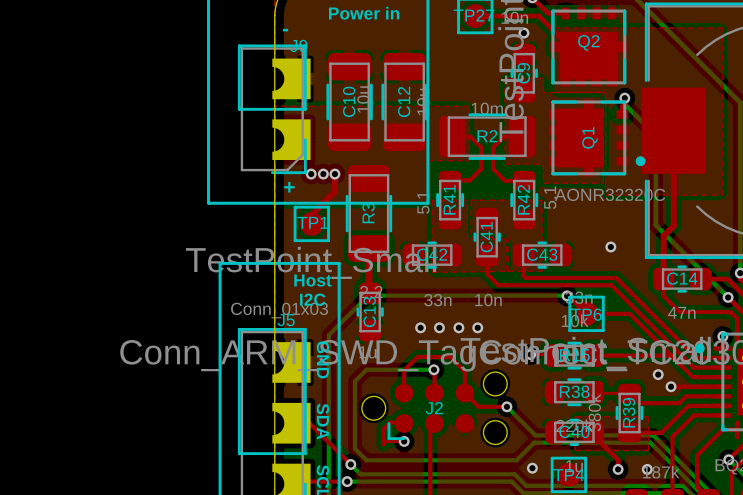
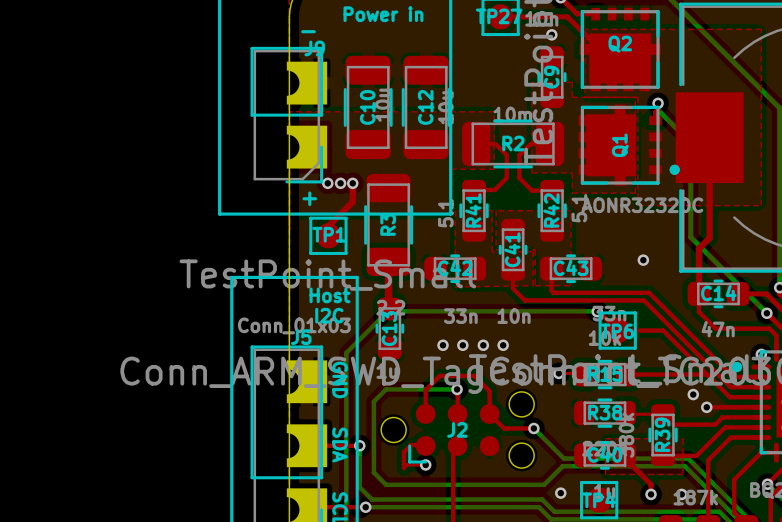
top track: (309, 423) (350, 464) -> (326, 445) (359, 445)
bottom track: (350, 464) (360, 474) -> (359, 445) (359, 487) (371, 499) (379, 499)
via position: (350, 464) -> (359, 445)

